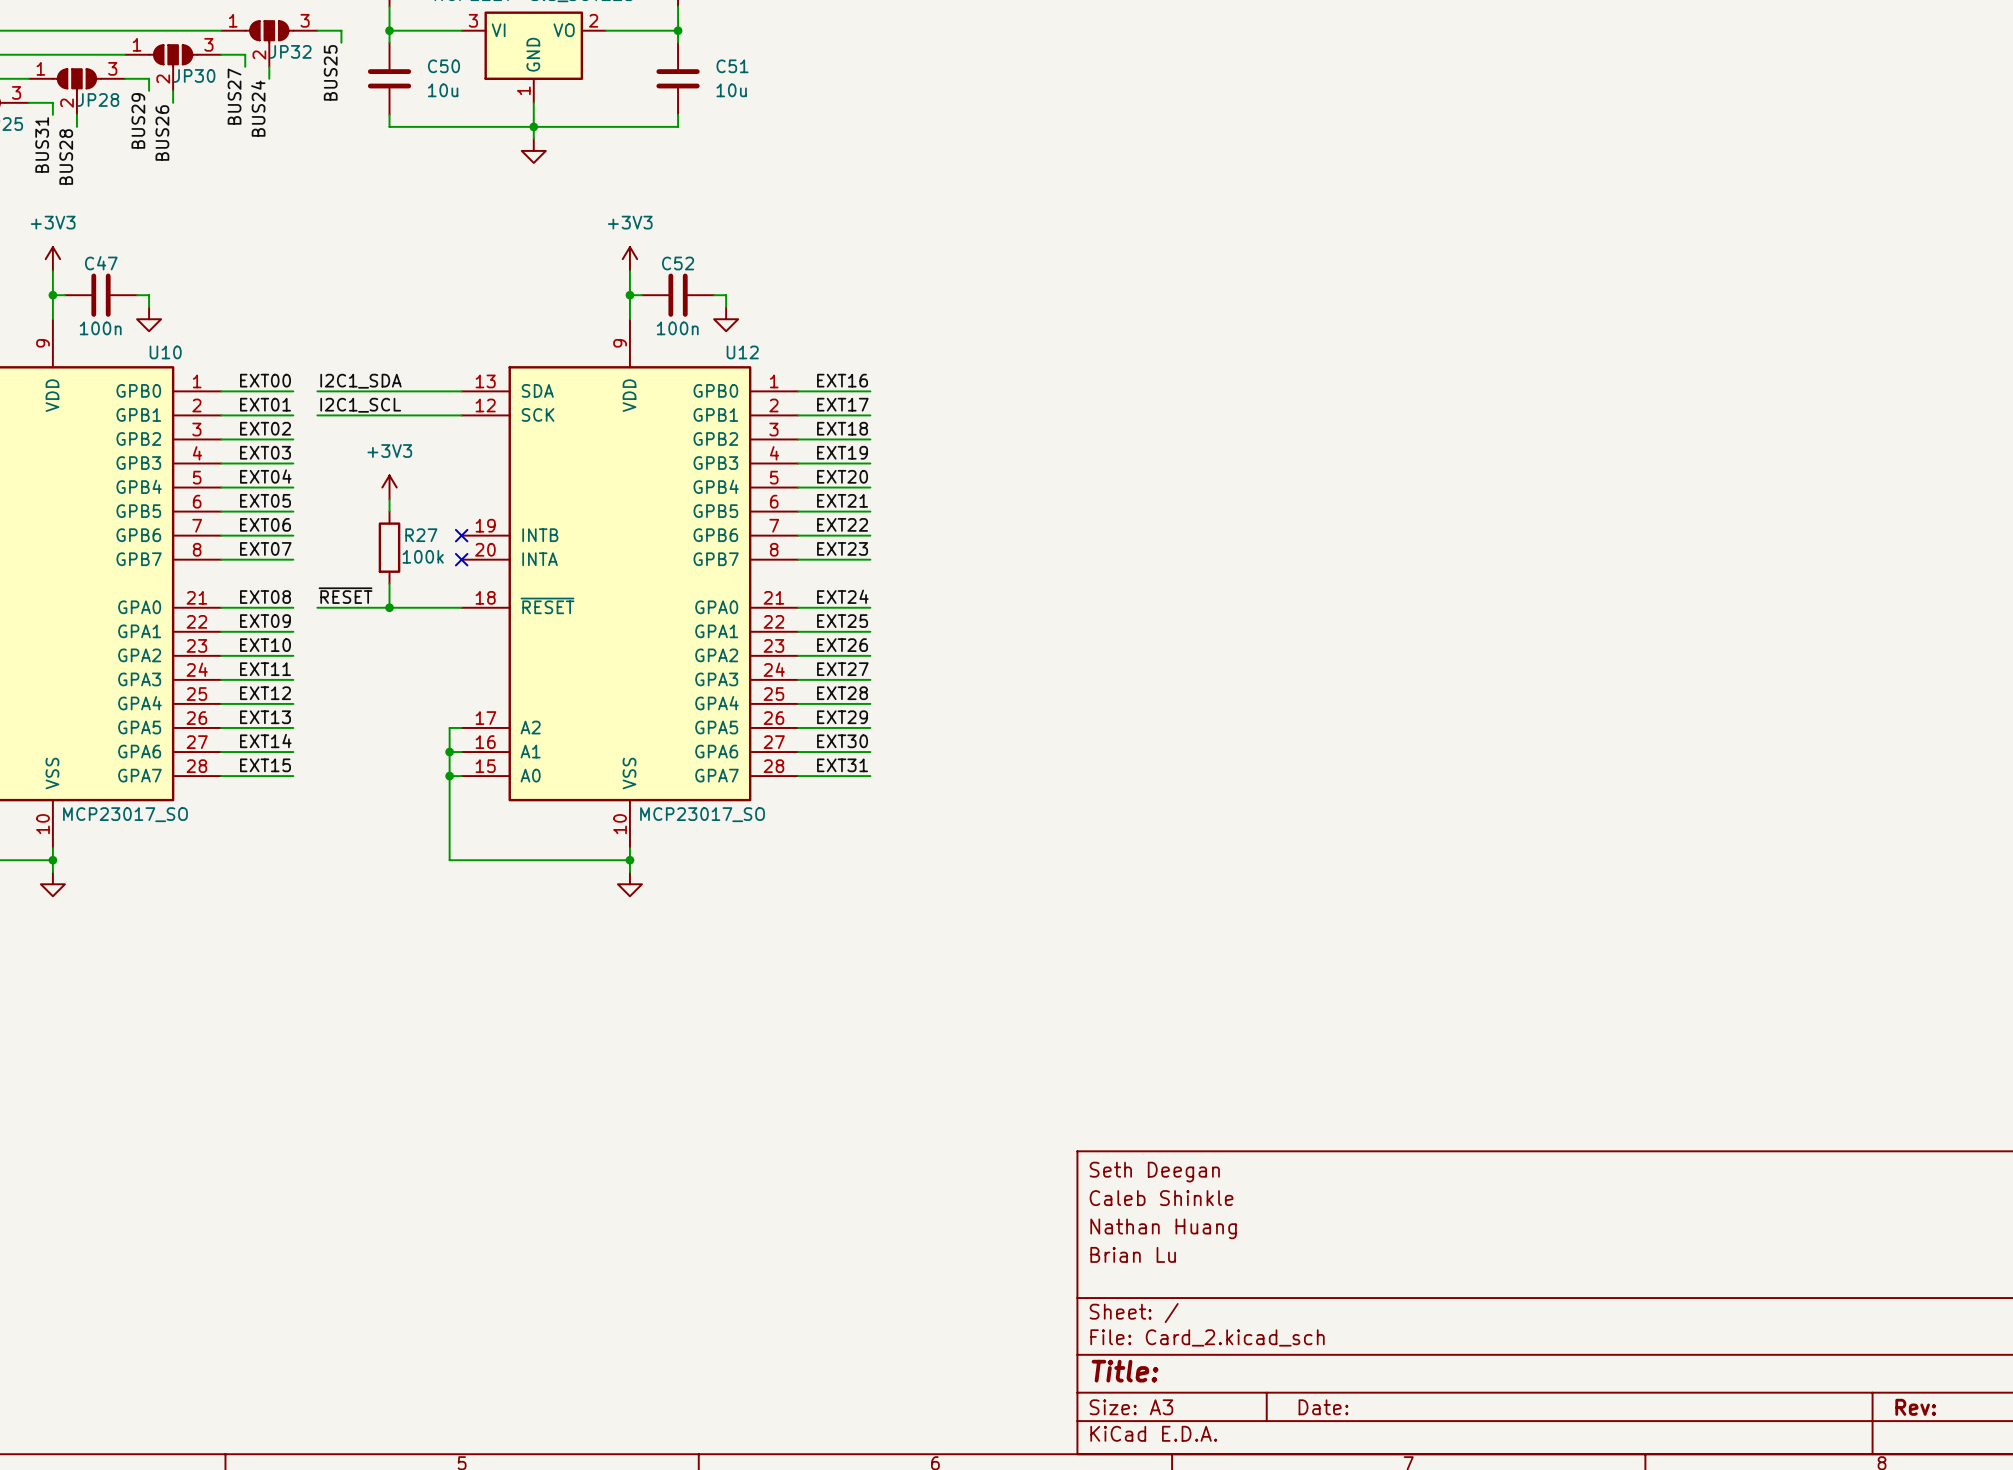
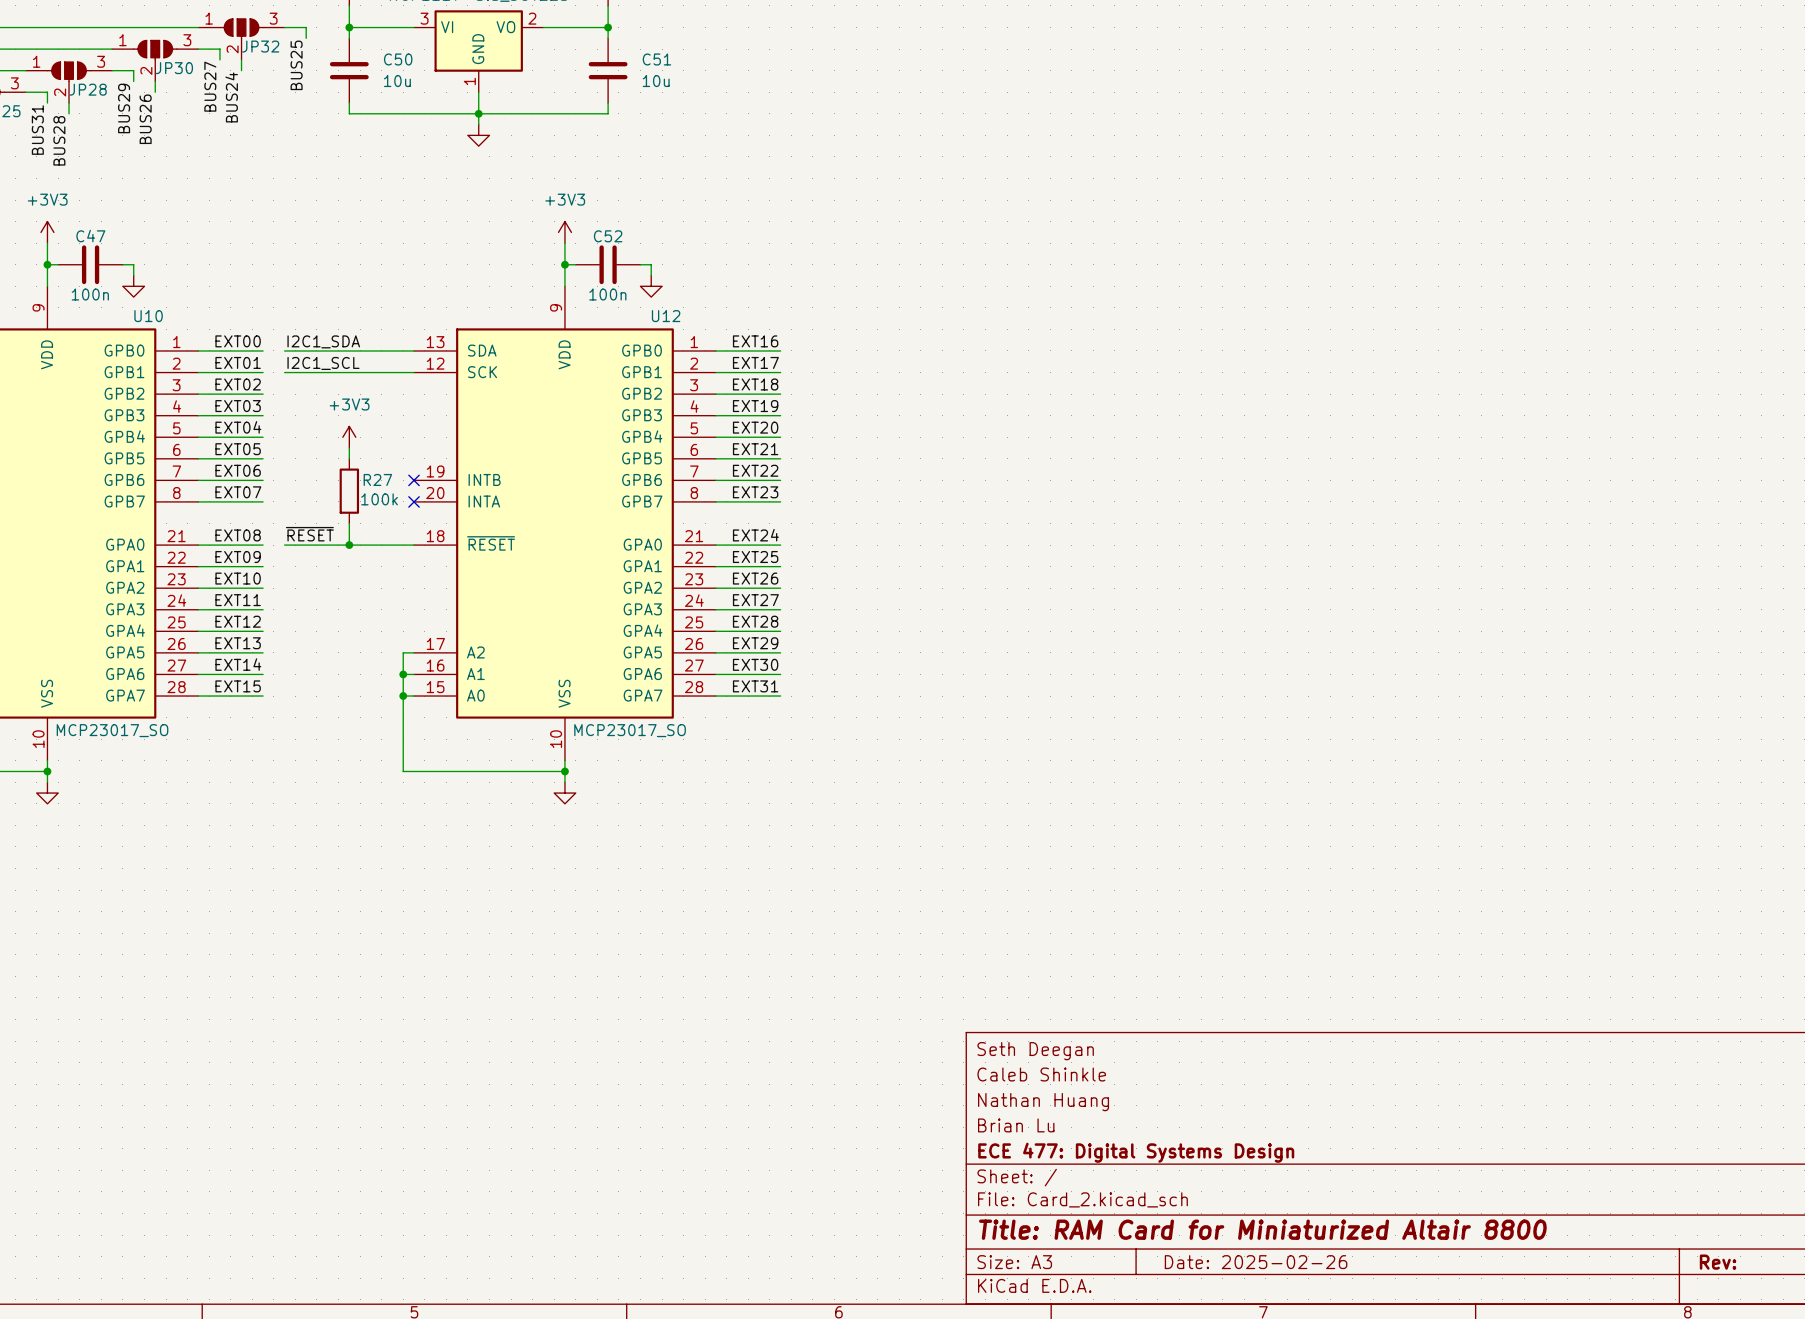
title block: none -> ECE 477: Digital Systems Design (1136, 1152)
title block: Title: (1125, 1371) -> Title: RAM Card for Miniaturized Altair 8800 (1262, 1229)
title block: Date: (1323, 1407) -> Date: 2025-02-26 (1256, 1262)

